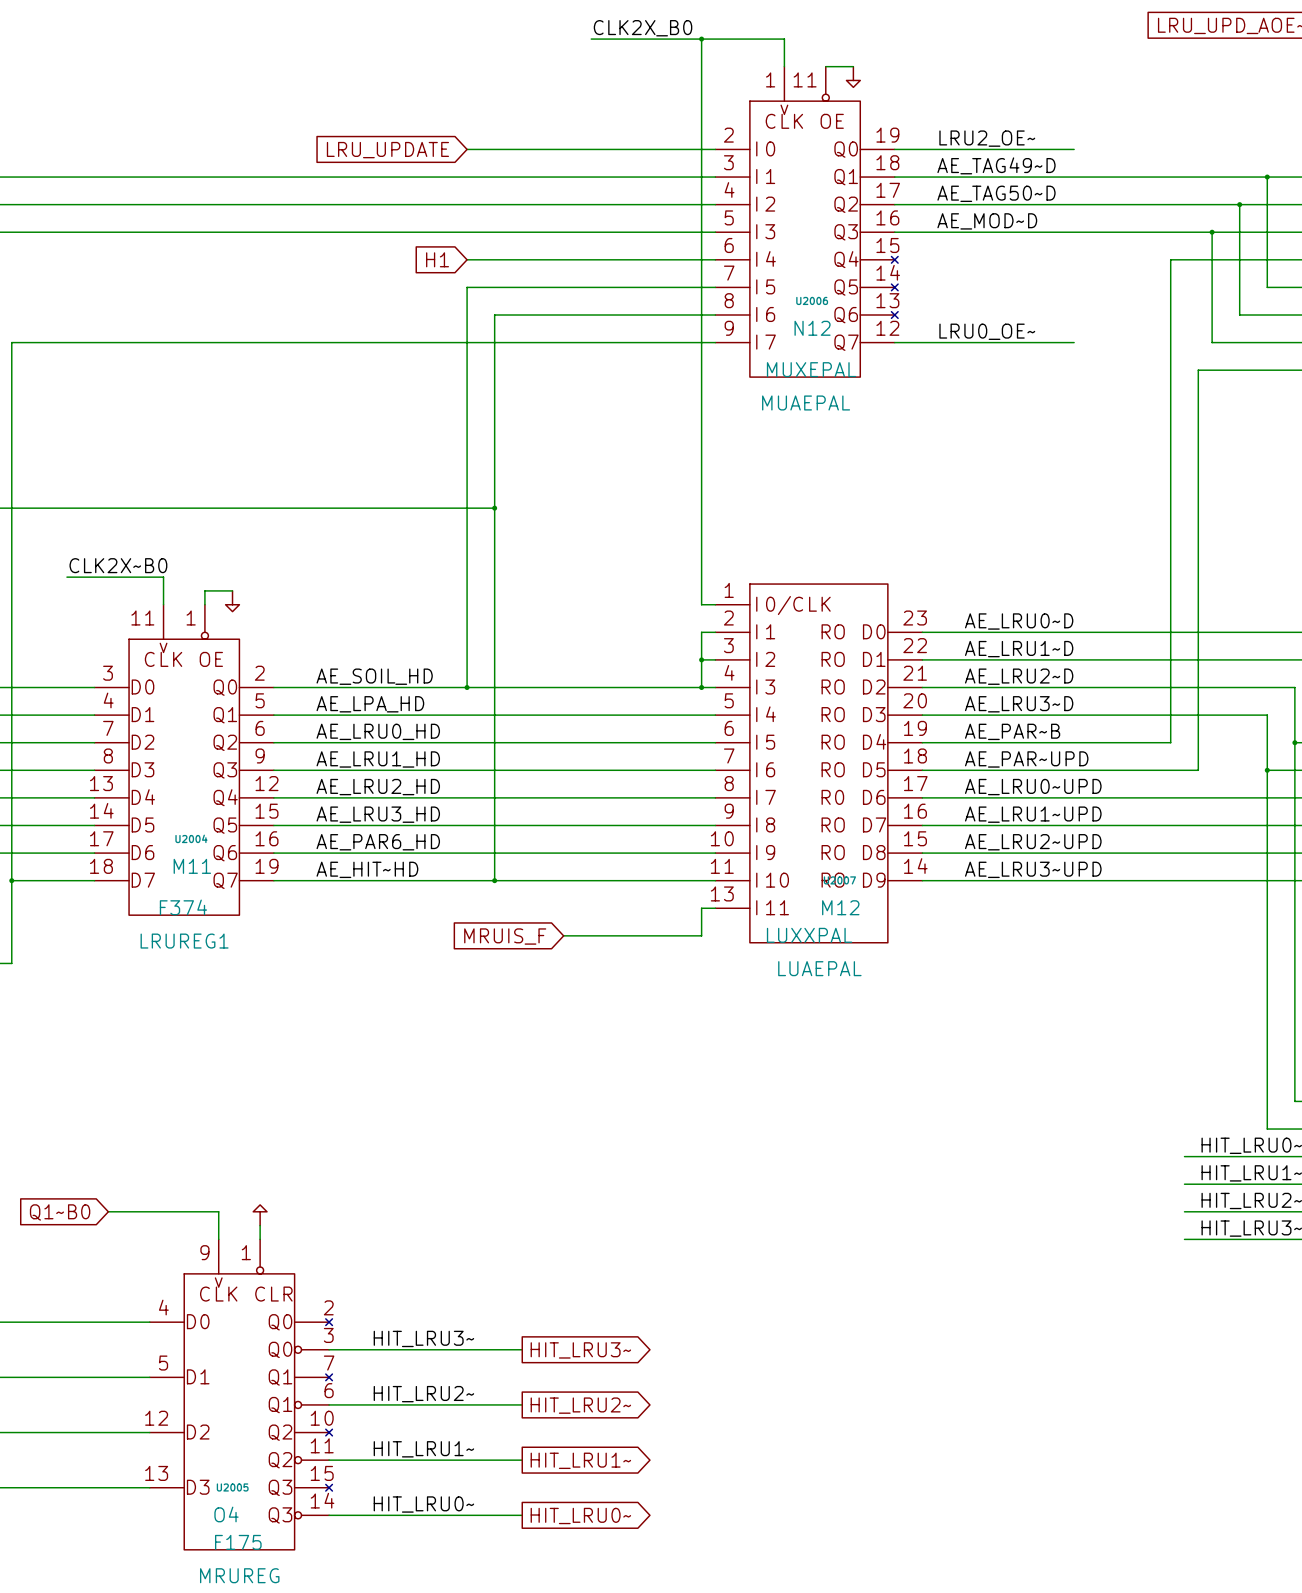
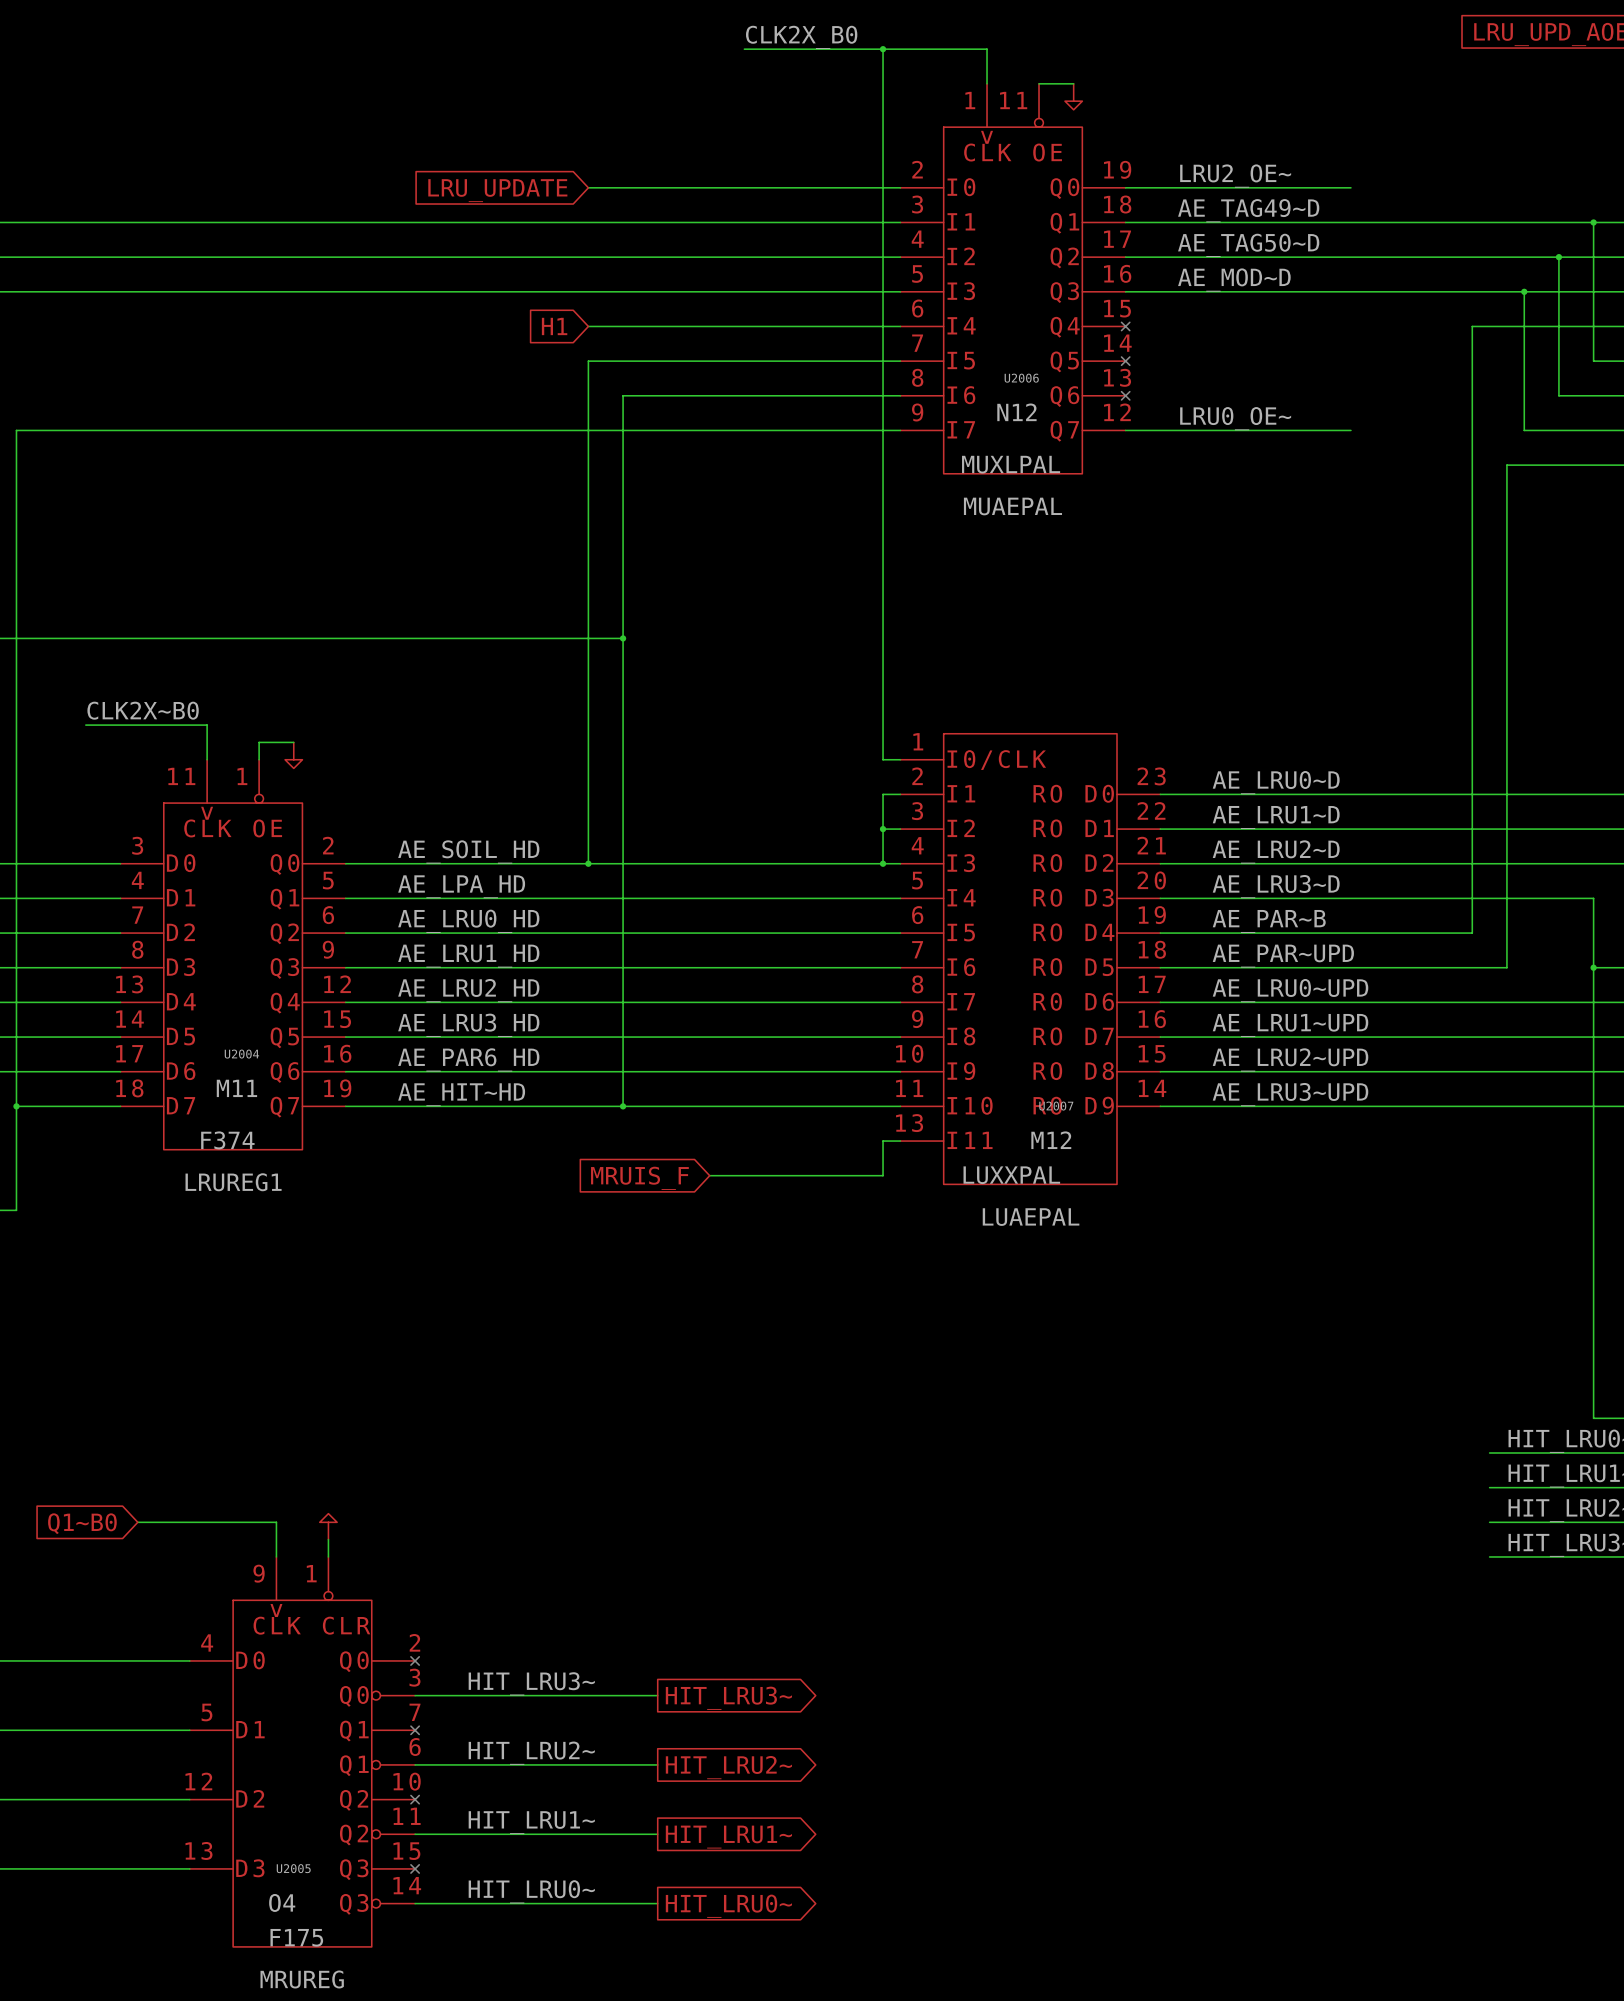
U2006 value: MUXEPAL (811, 369) -> MUXLPAL (1011, 464)

